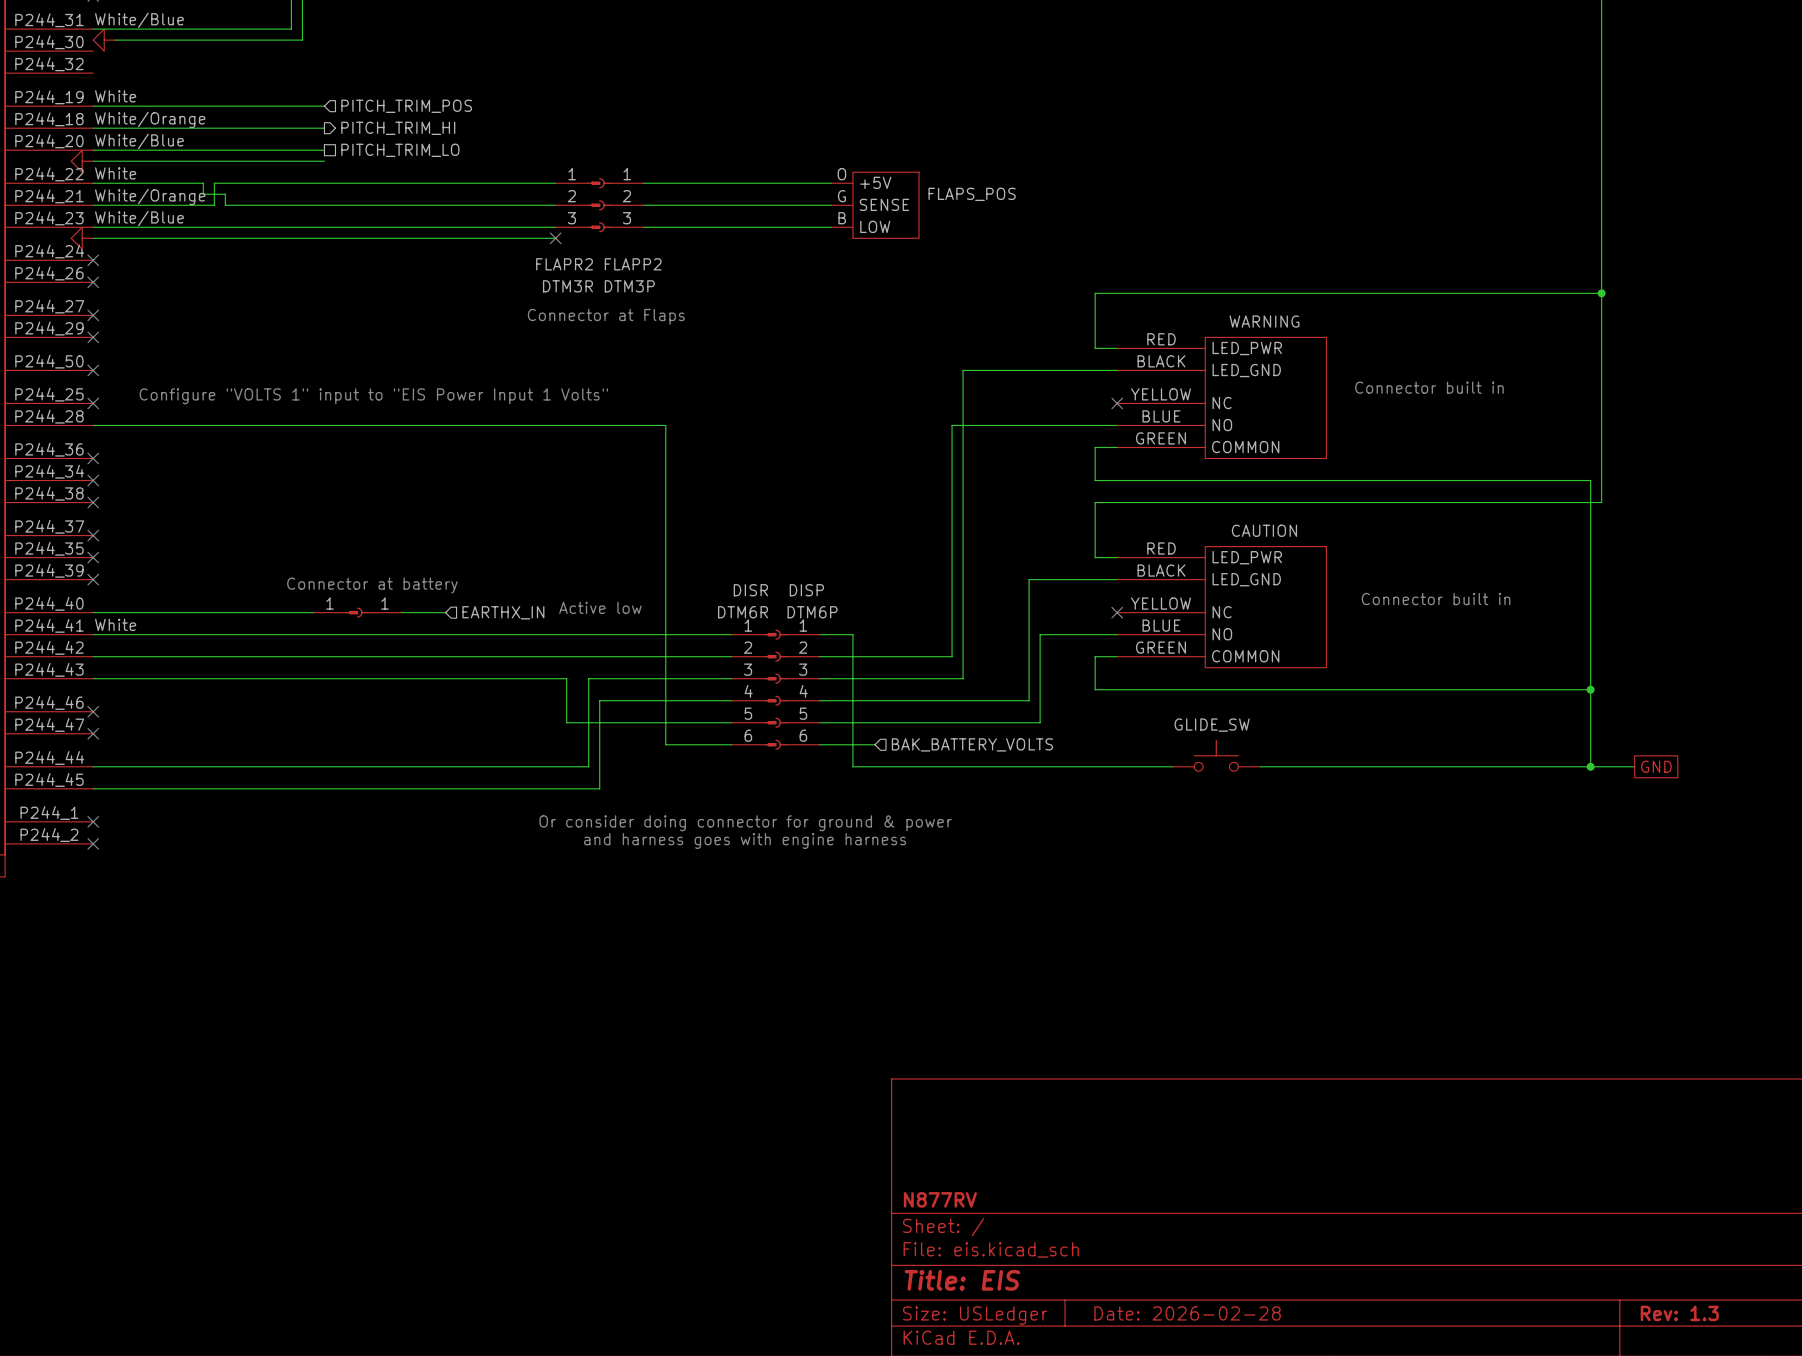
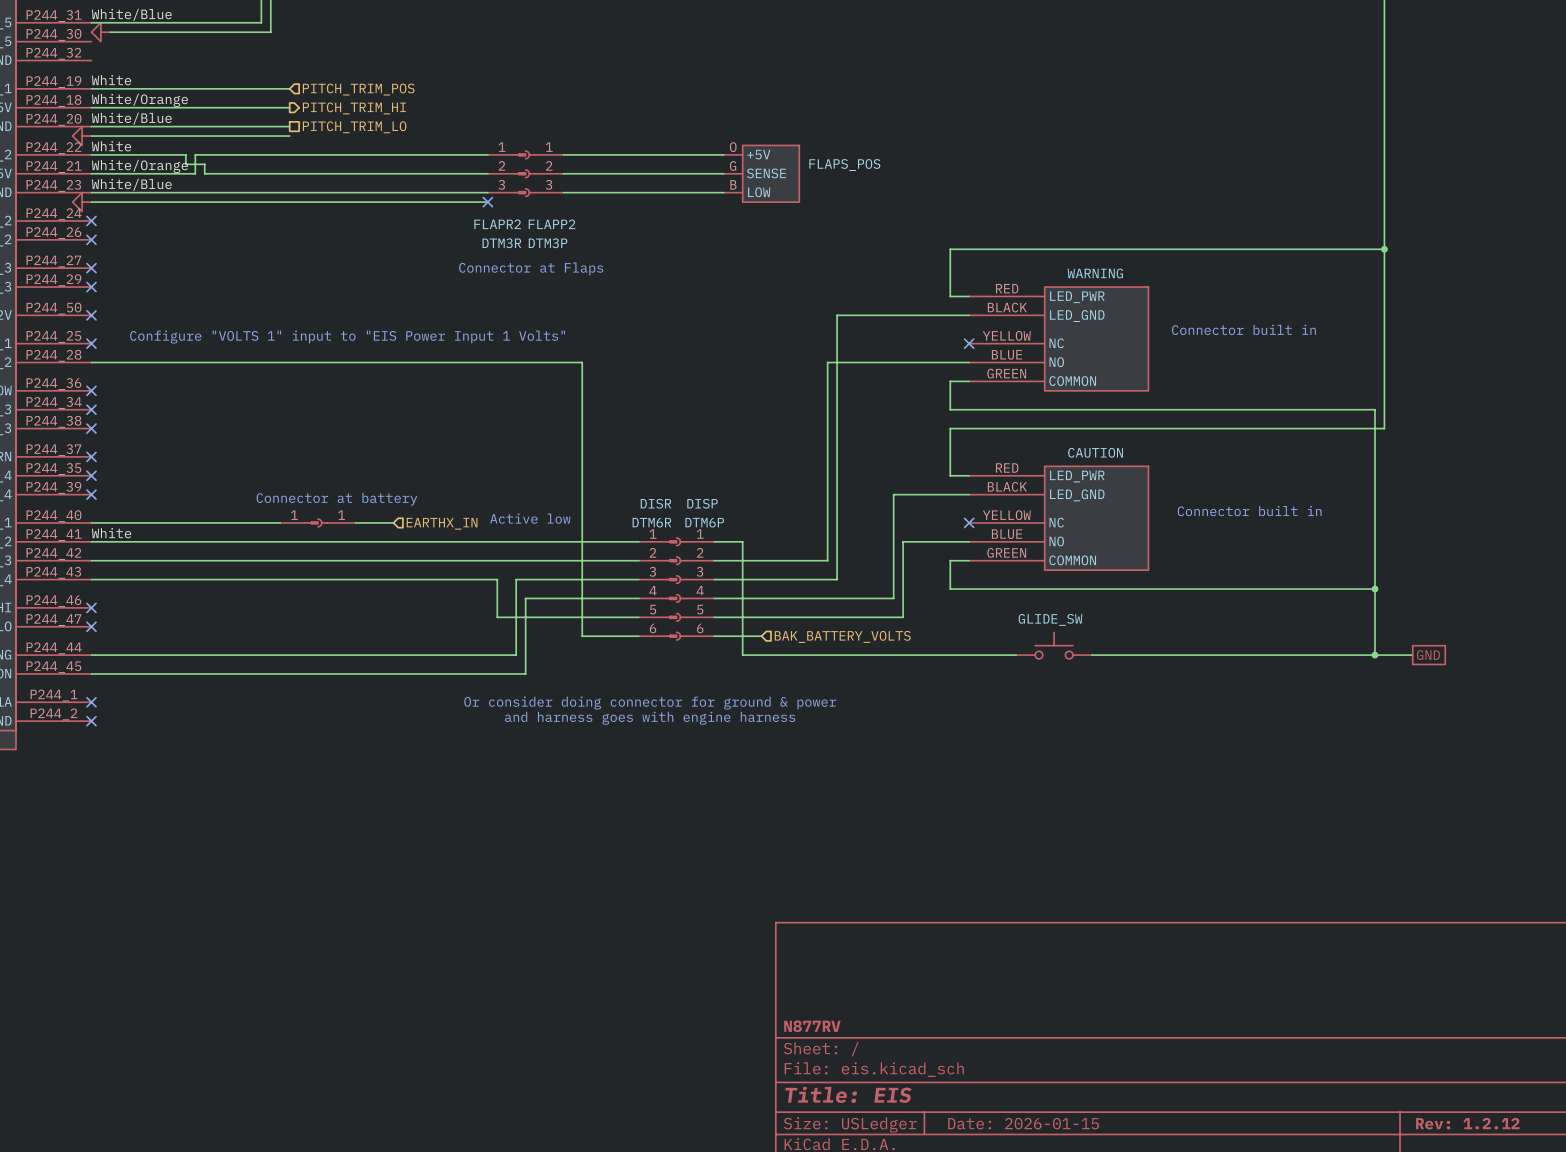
title block: Date: 2026-02-28 (1187, 1313) -> Date: 2026-01-15 (1023, 1123)
title block: Rev: 1.3 (1679, 1313) -> Rev: 1.2.12 (1467, 1123)

